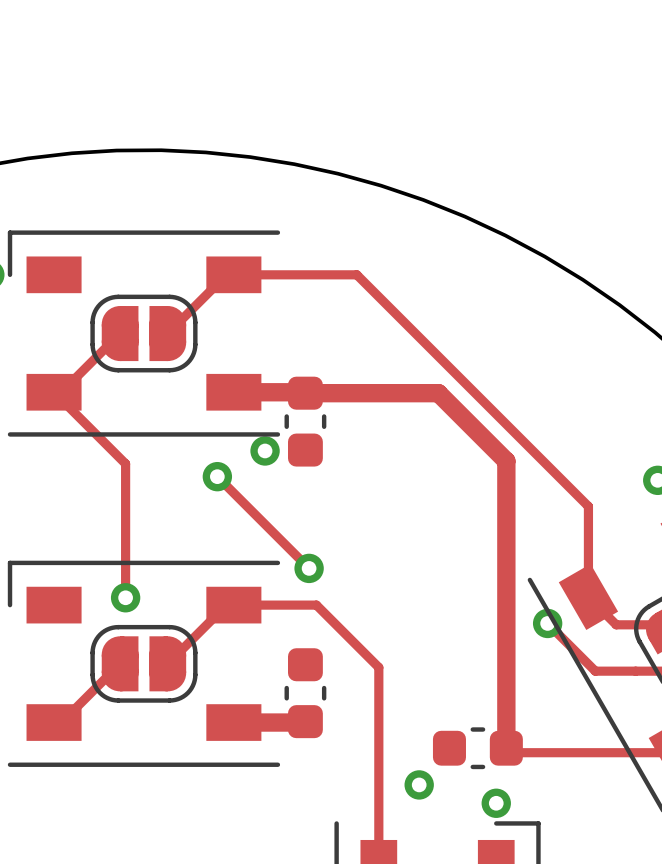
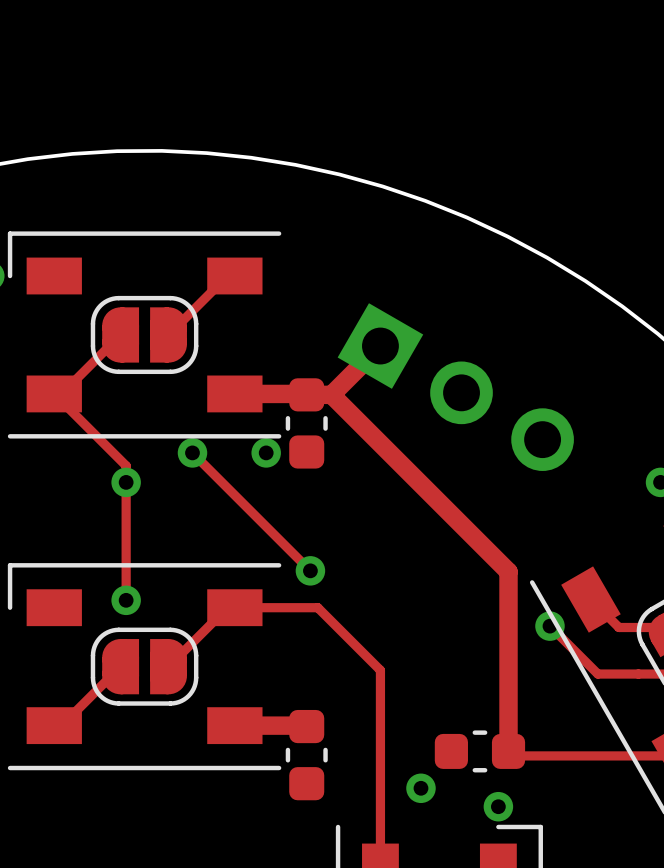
track: (233, 274) (356, 274) (588, 506) (588, 596) -> none
part: none -> (455, 387)
track: (330, 393) (438, 393) (506, 461) (506, 569) -> (380, 346) (331, 394) (508, 571)
track: none -> (192, 452) (218, 478)
via position: (217, 476) -> (192, 452)
via: none -> (126, 482)
part position: (305, 693) -> (306, 755)

